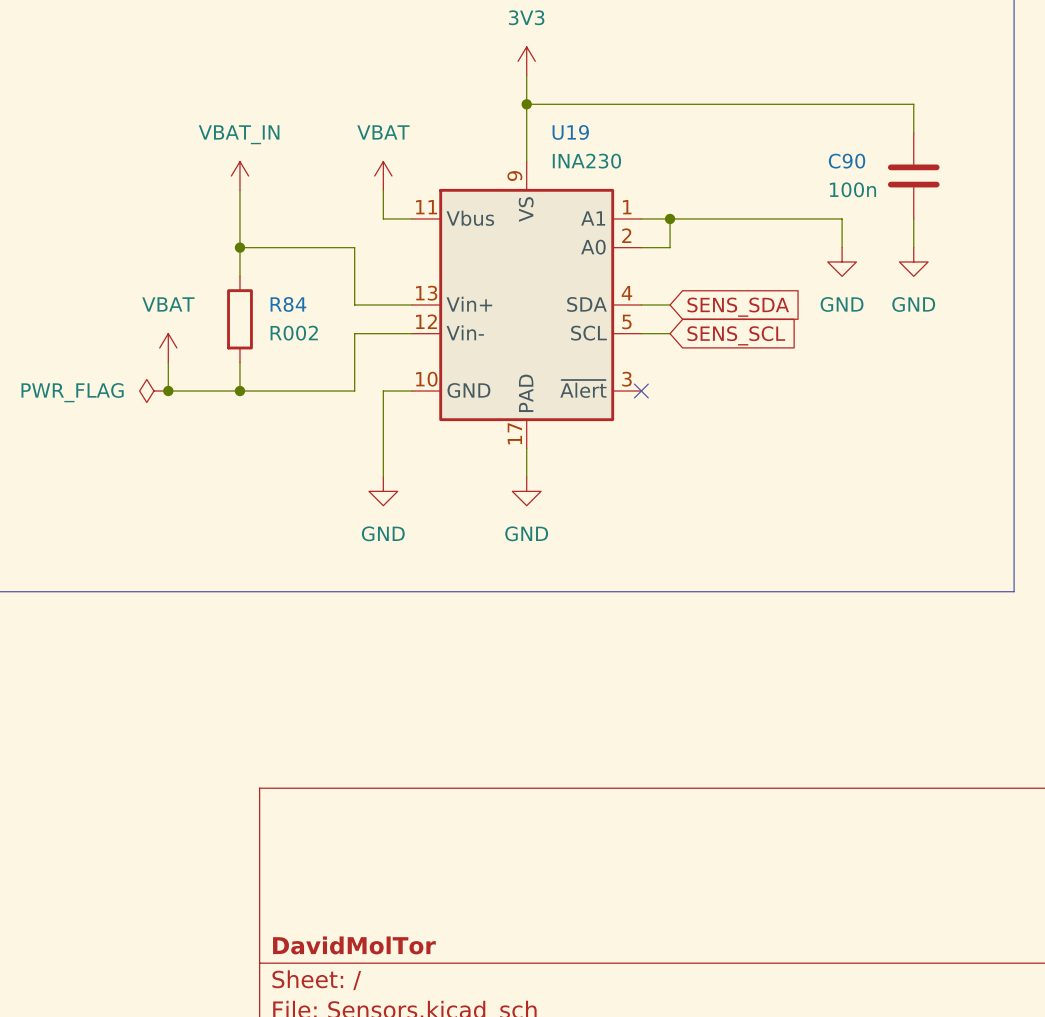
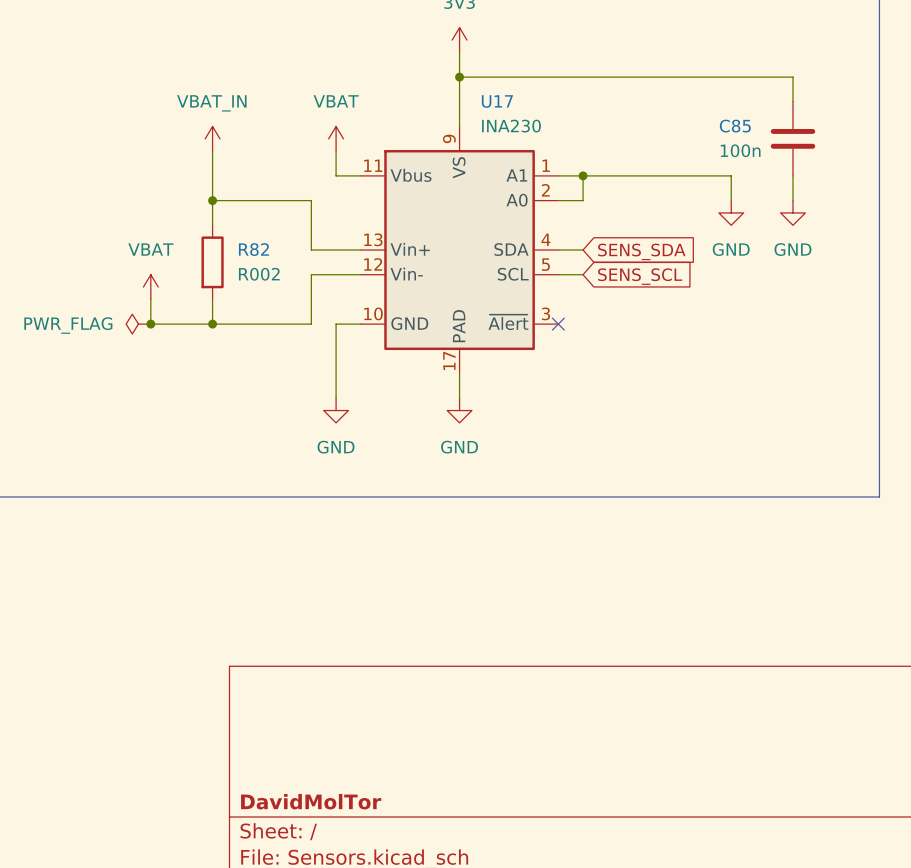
U19 name: U19 (570, 132) -> U17 (497, 101)
C90 name: C90 (847, 161) -> C85 (735, 126)
R84 name: R84 (288, 304) -> R82 (253, 249)

